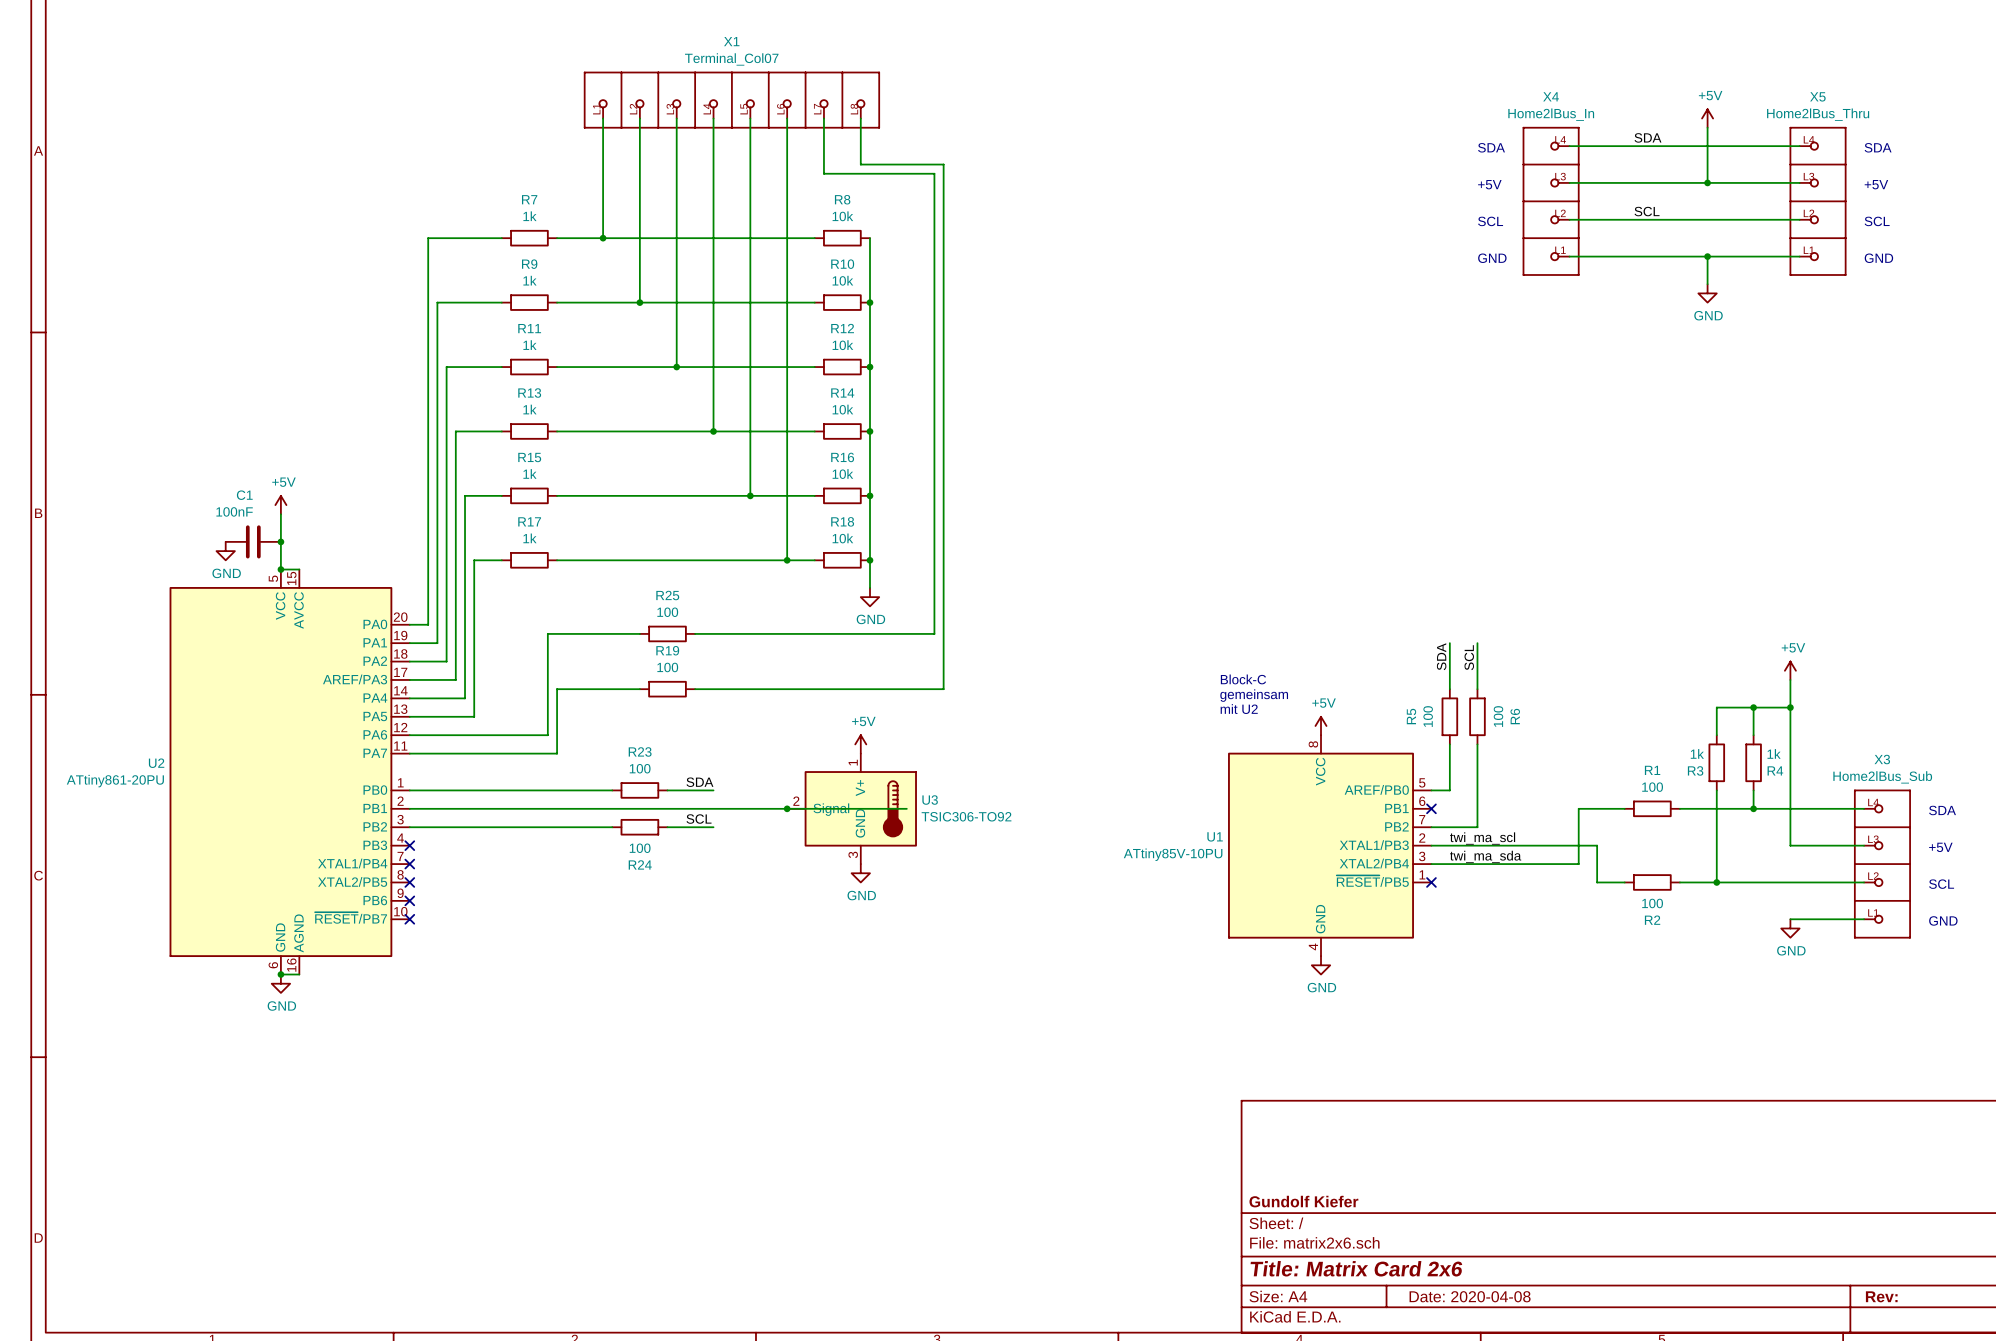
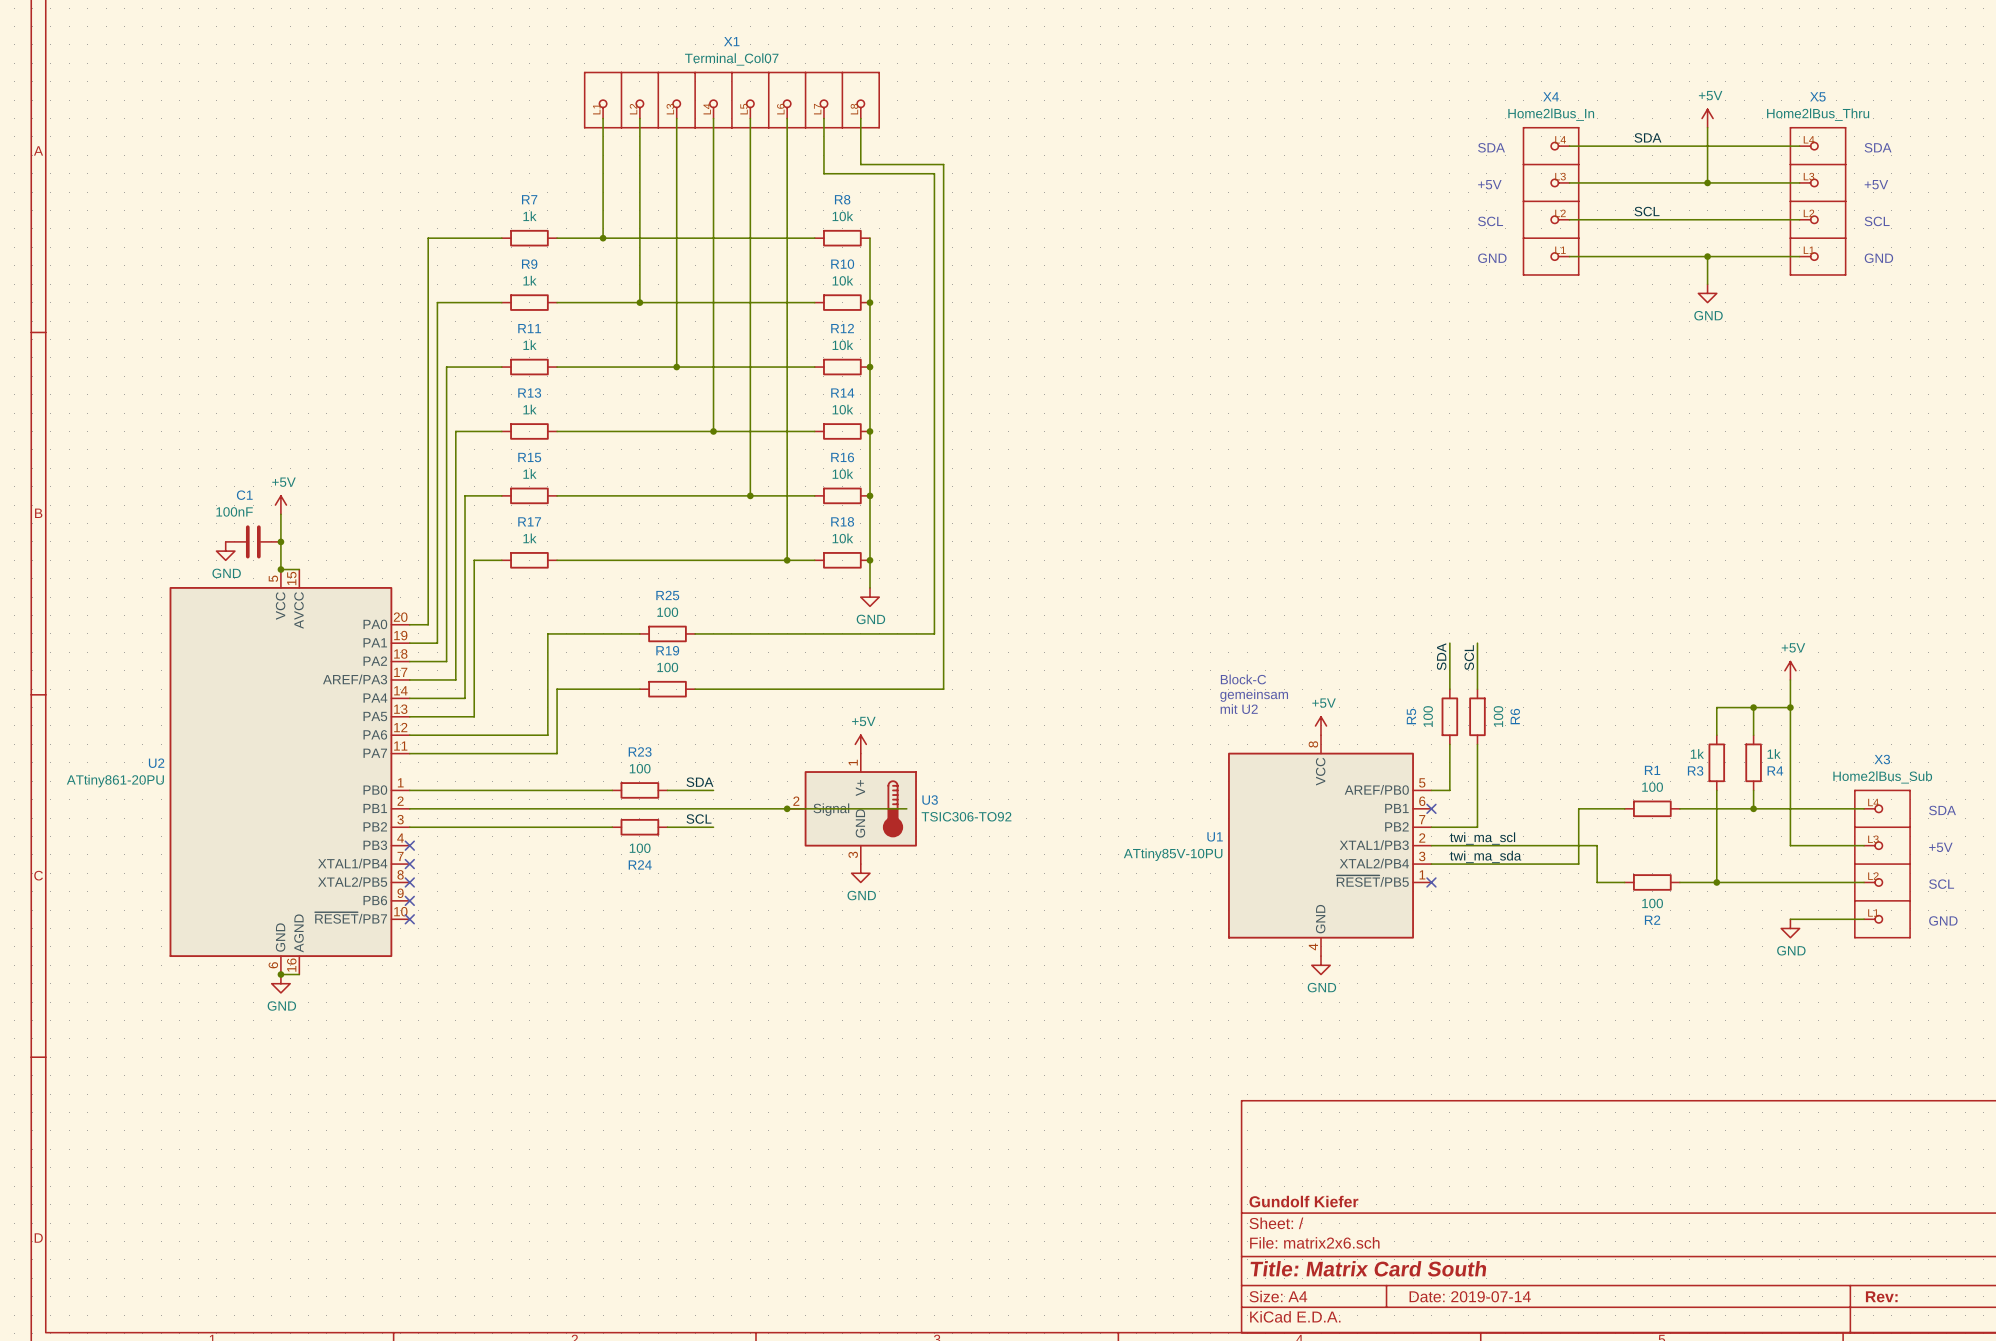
title block: Title: Matrix Card 2x6 (1356, 1268) -> Title: Matrix Card South (1368, 1268)
title block: Date: 2020-04-08 (1470, 1296) -> Date: 2019-07-14 (1470, 1296)

